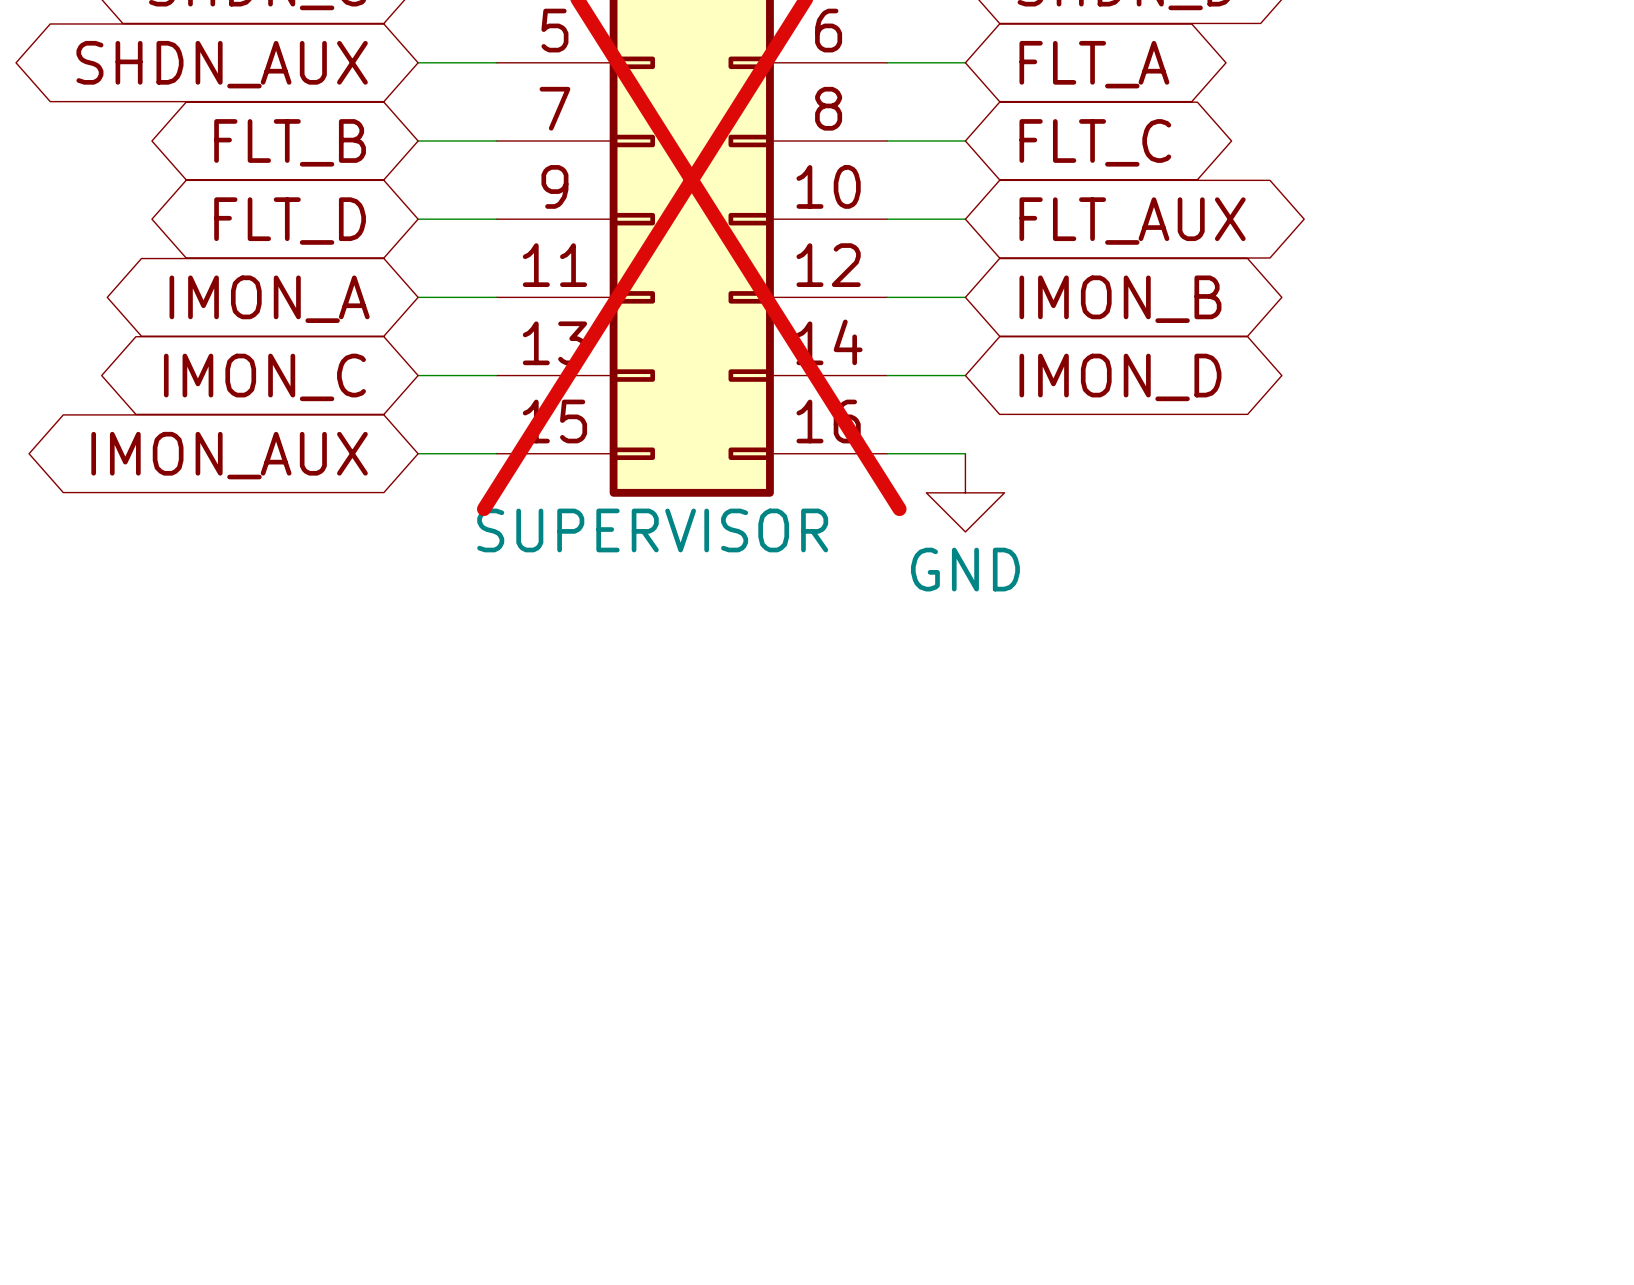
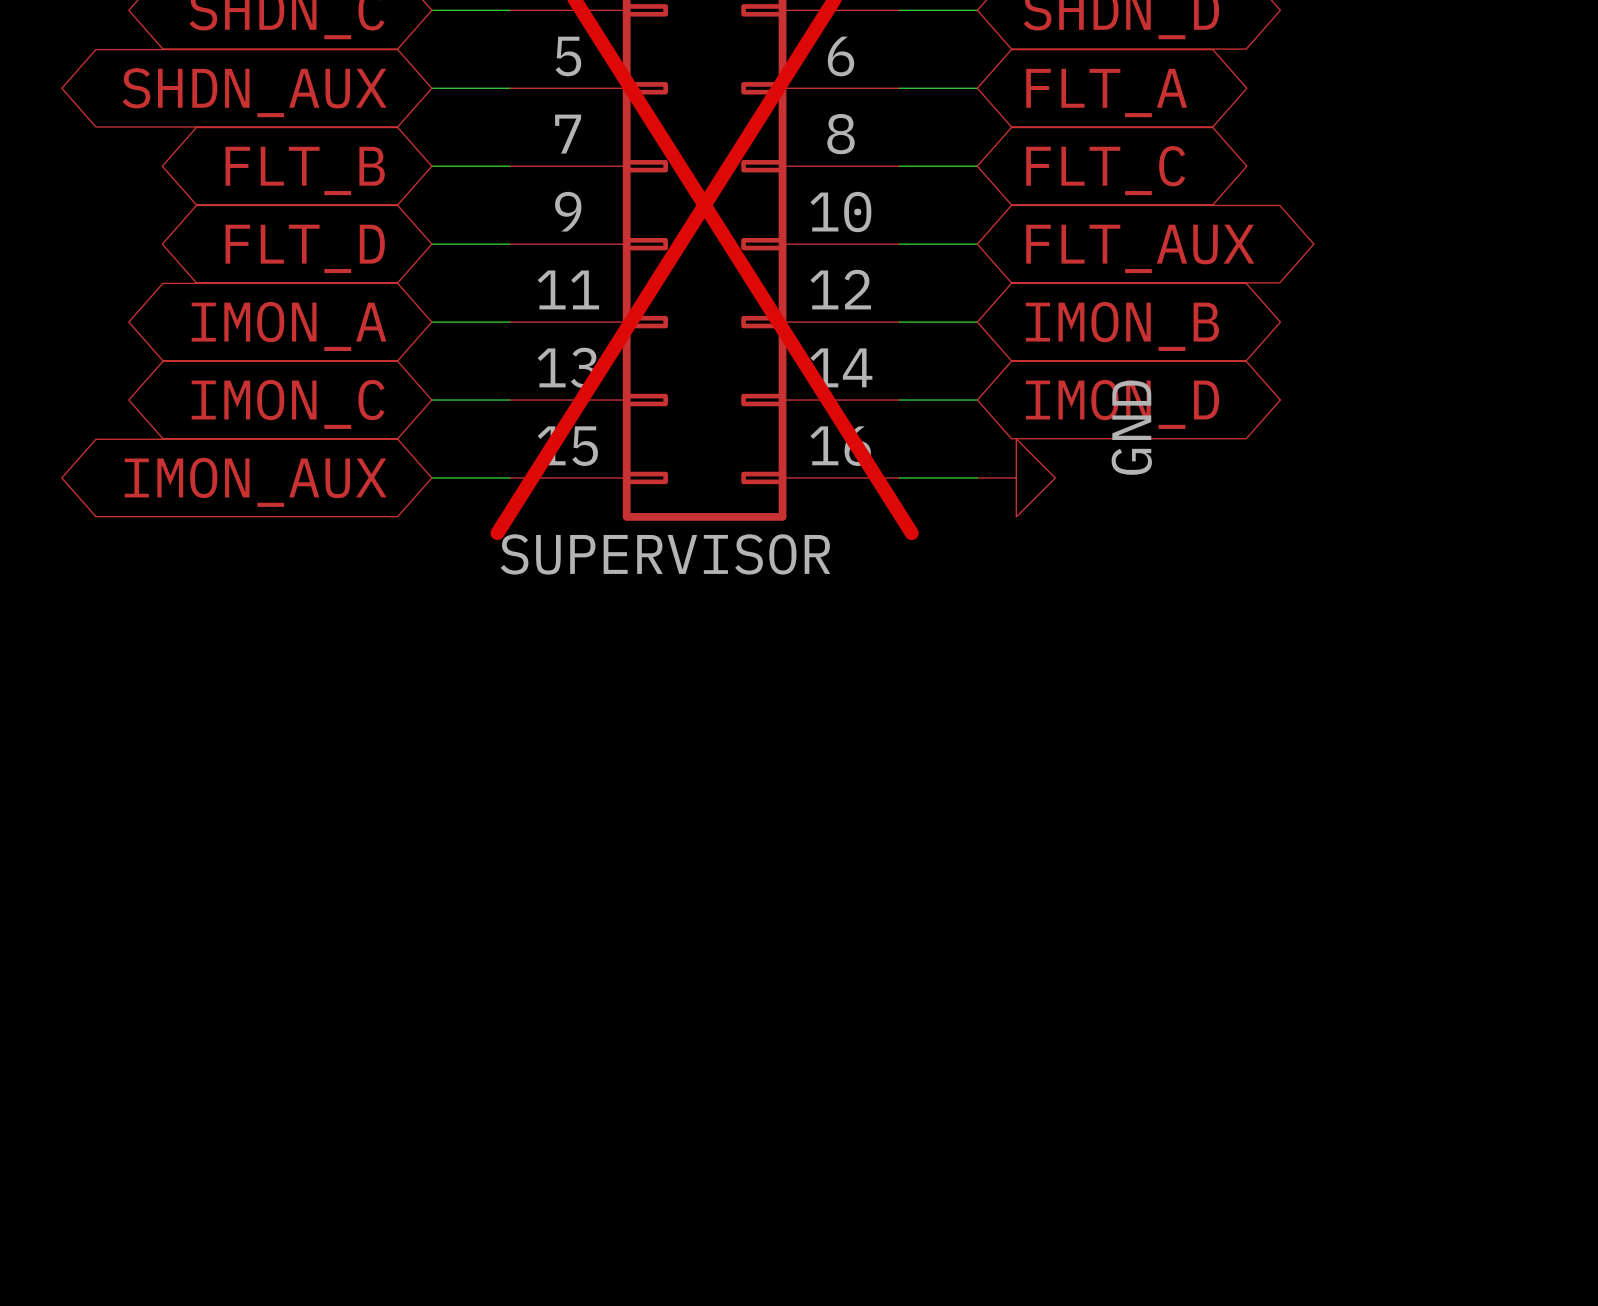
power symbol rotation: 0° (965, 492) -> 90° counterclockwise (1016, 477)
power symbol position: GND (965, 492) -> GND (1016, 477)
power symbol text position: GND (965, 569) -> GND (1131, 427)

